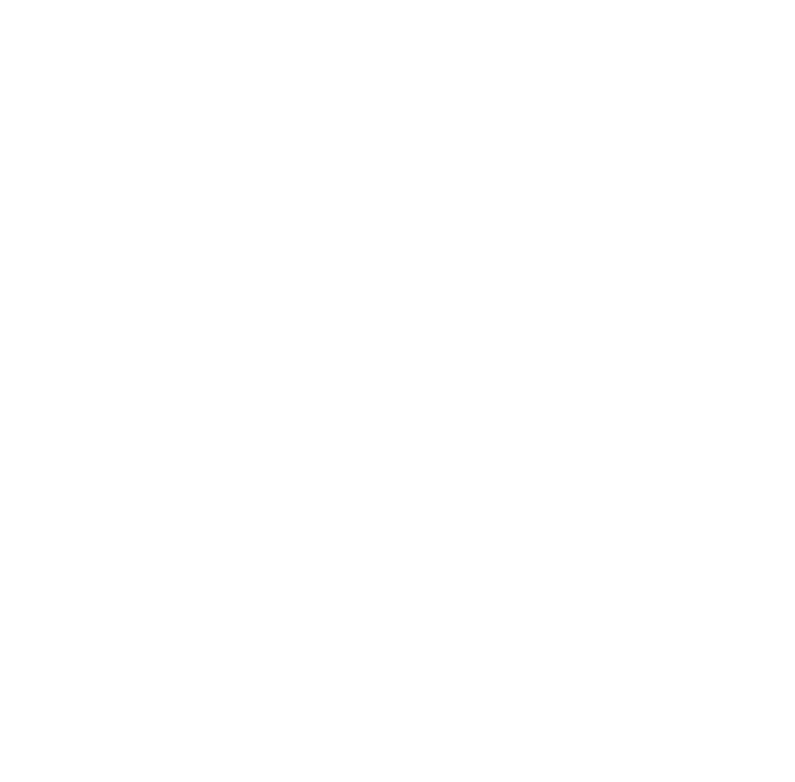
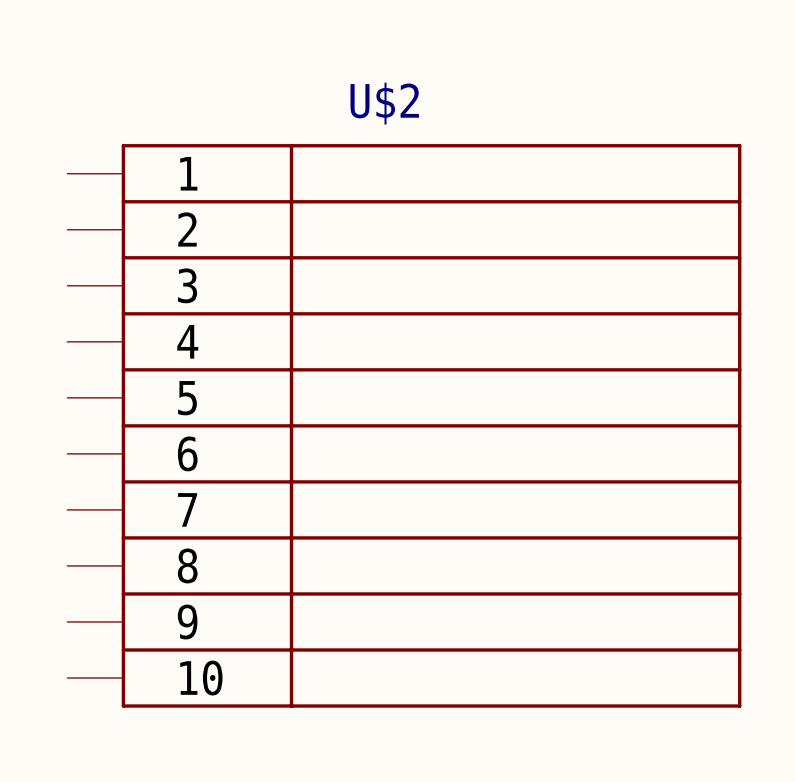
U$2: none -> (404, 425)

